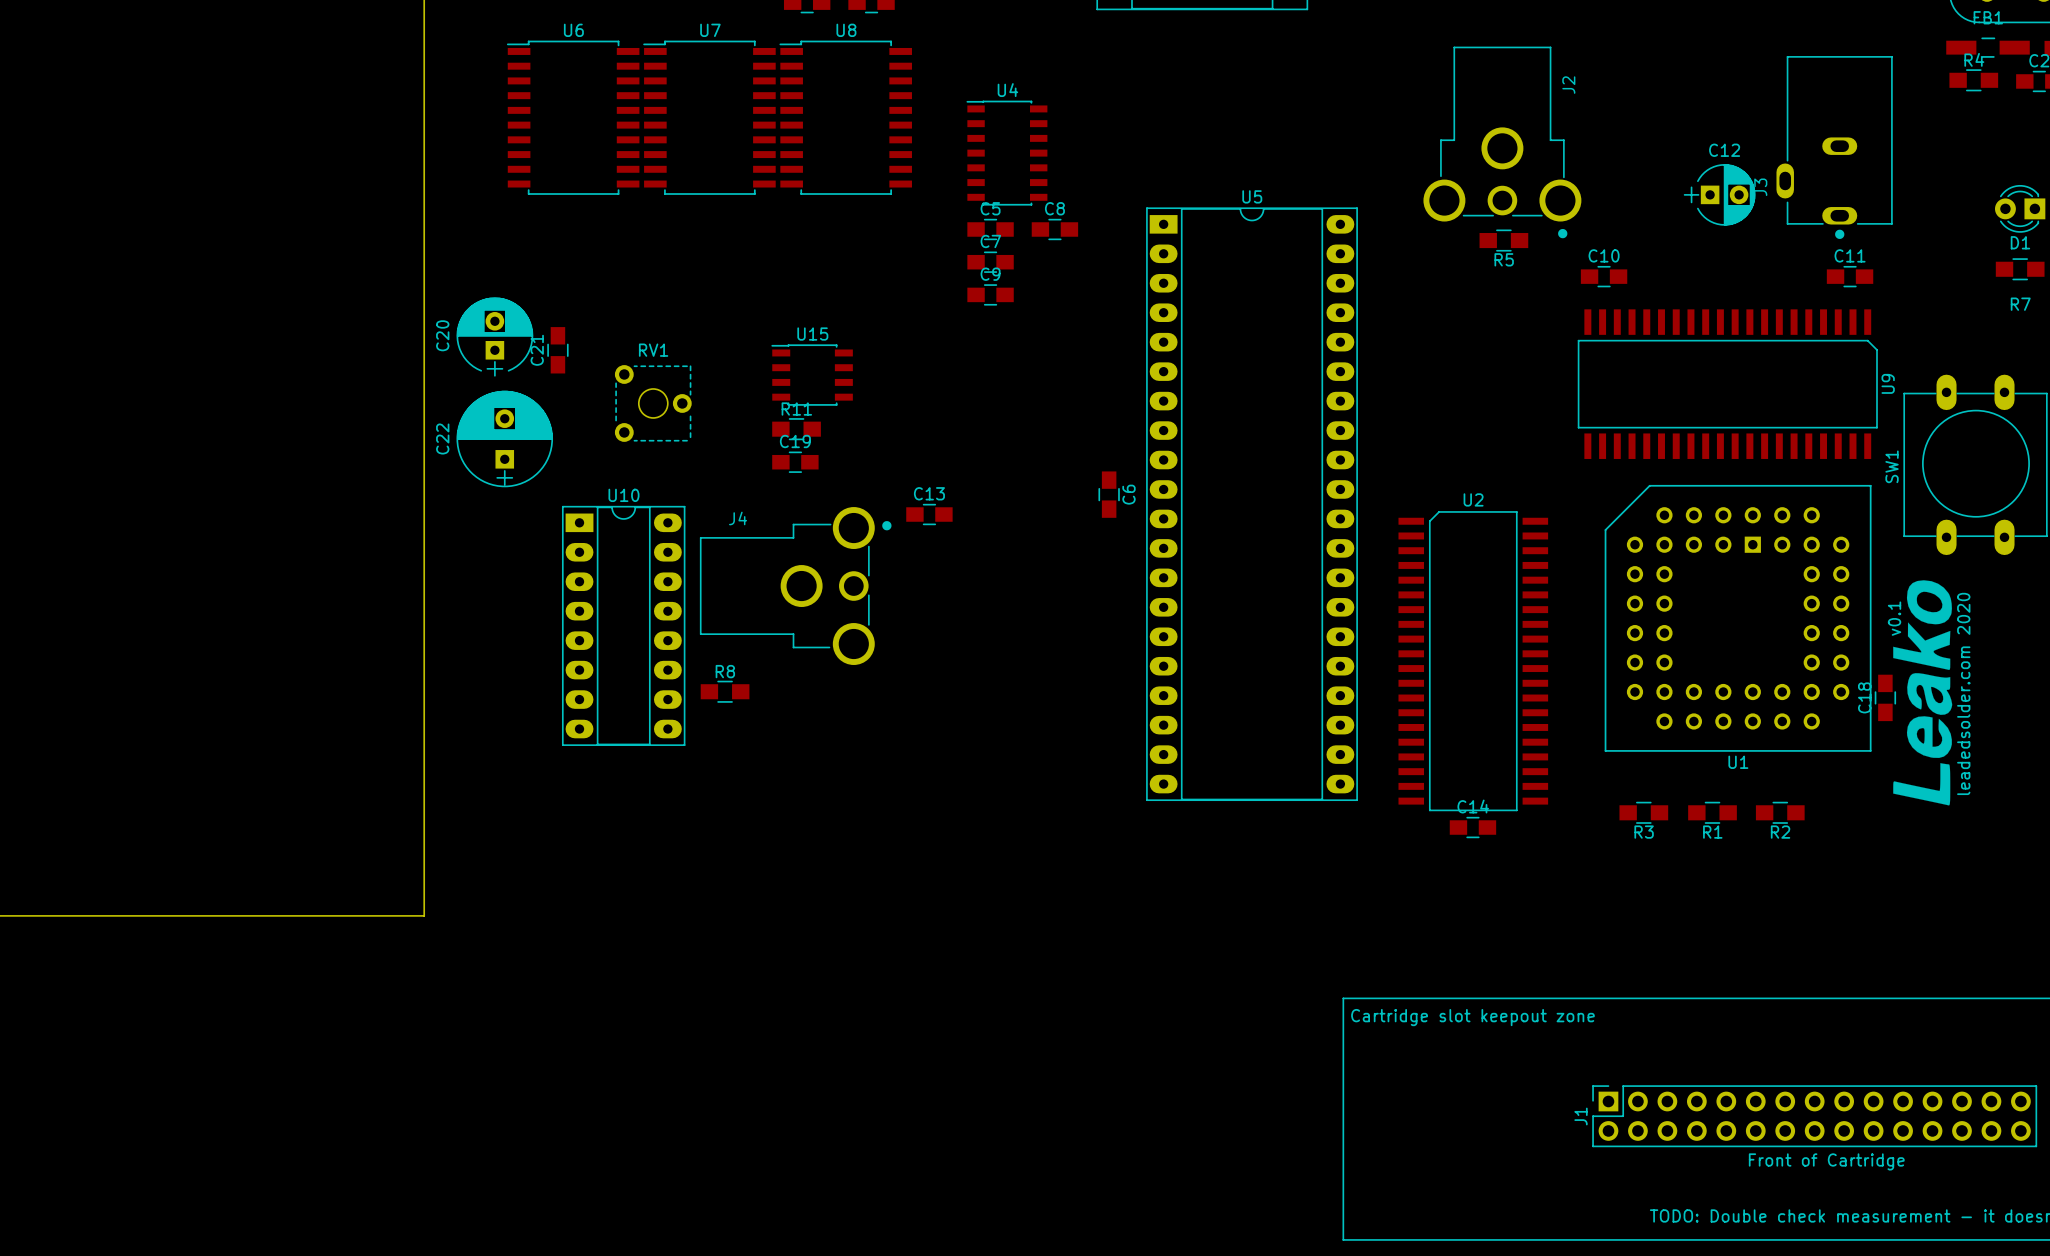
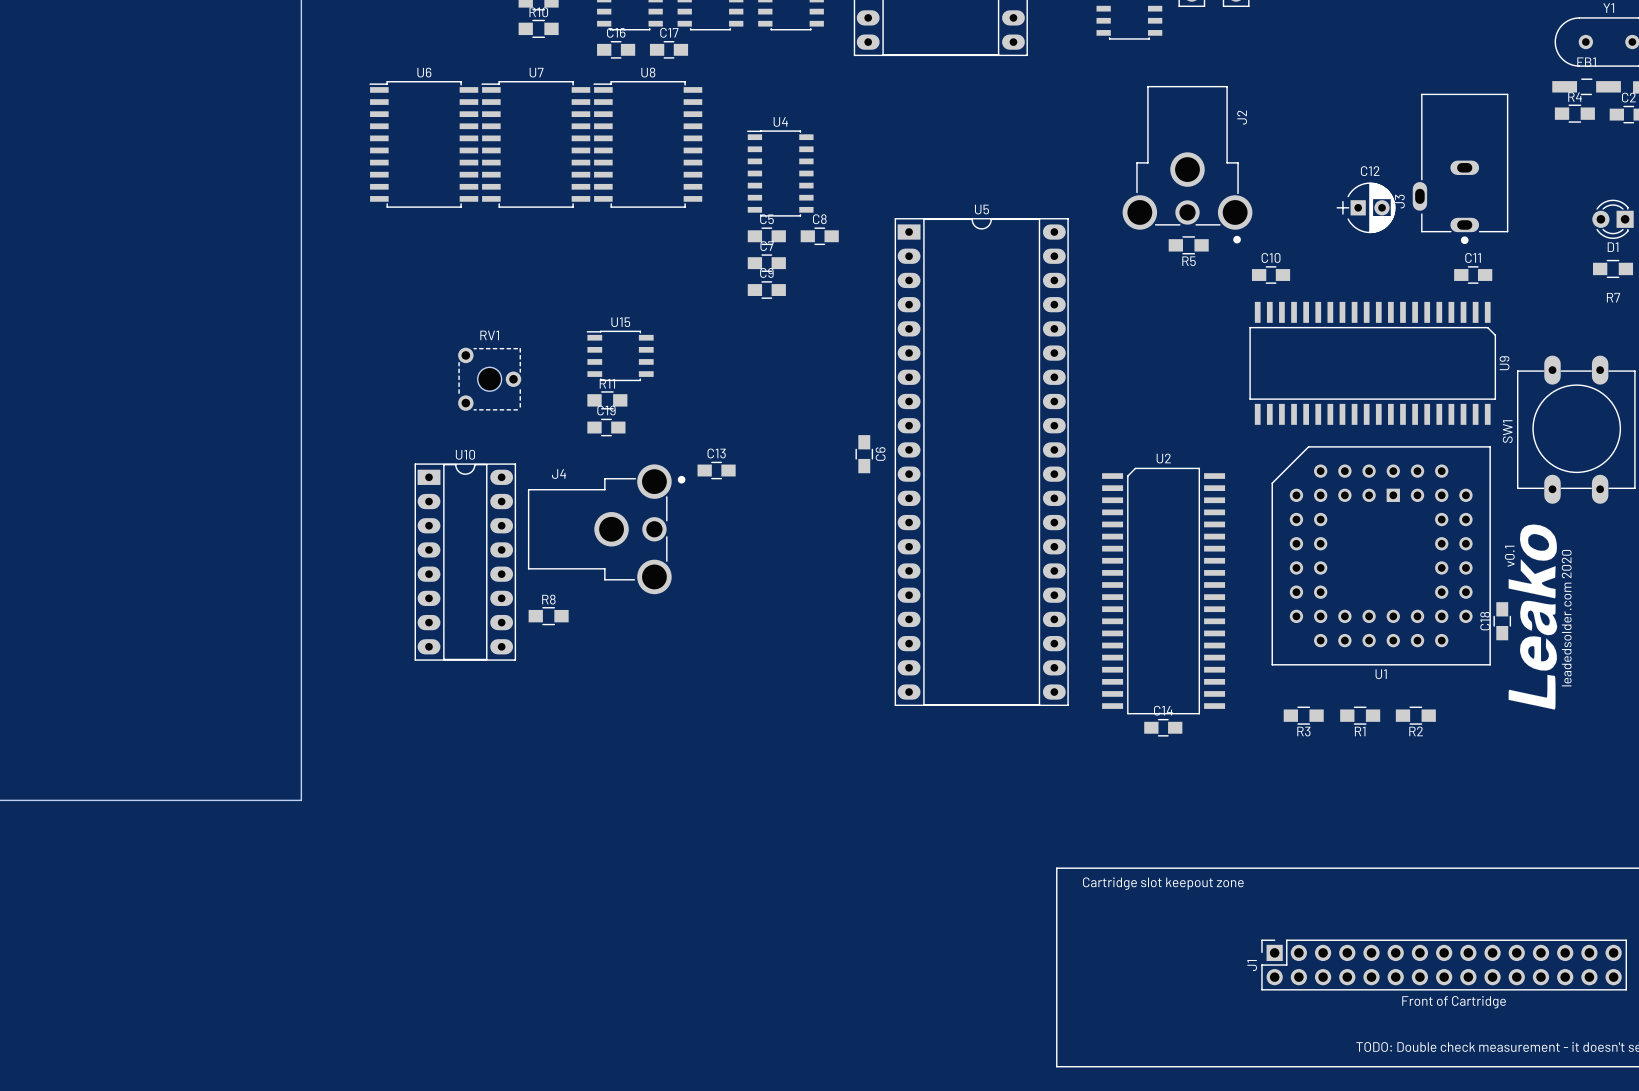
C20: (494, 337) -> none
C21: (557, 350) -> none
C22: (504, 439) -> none

